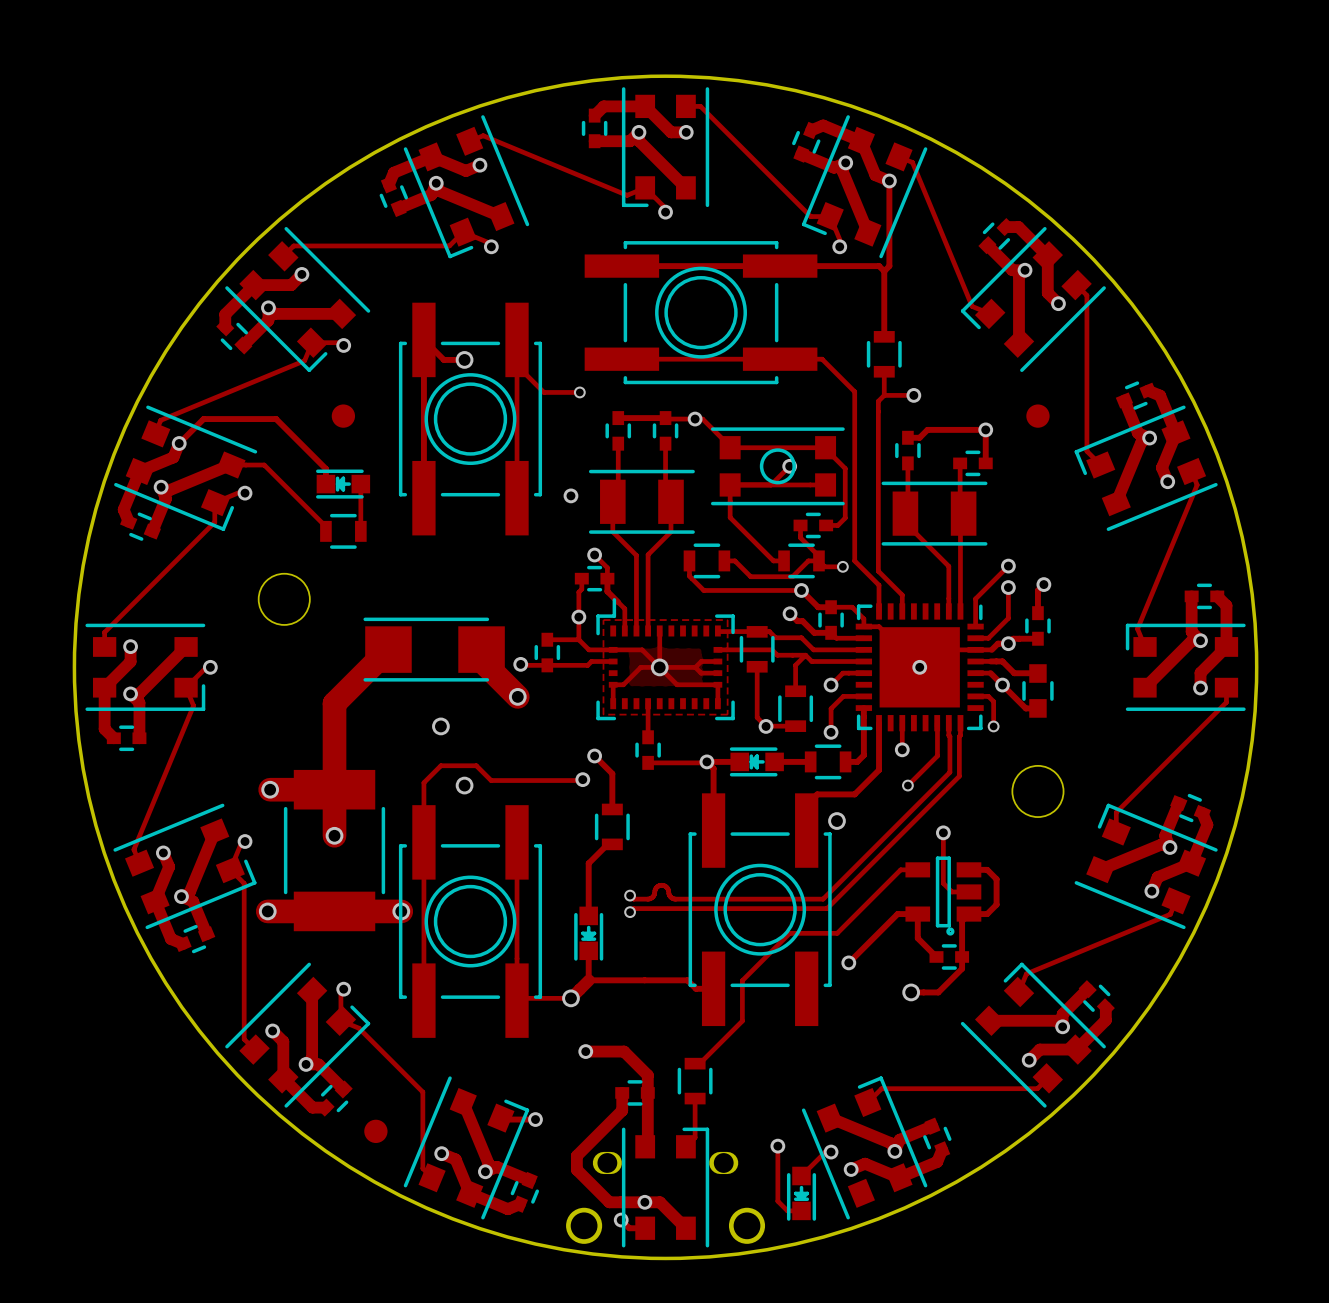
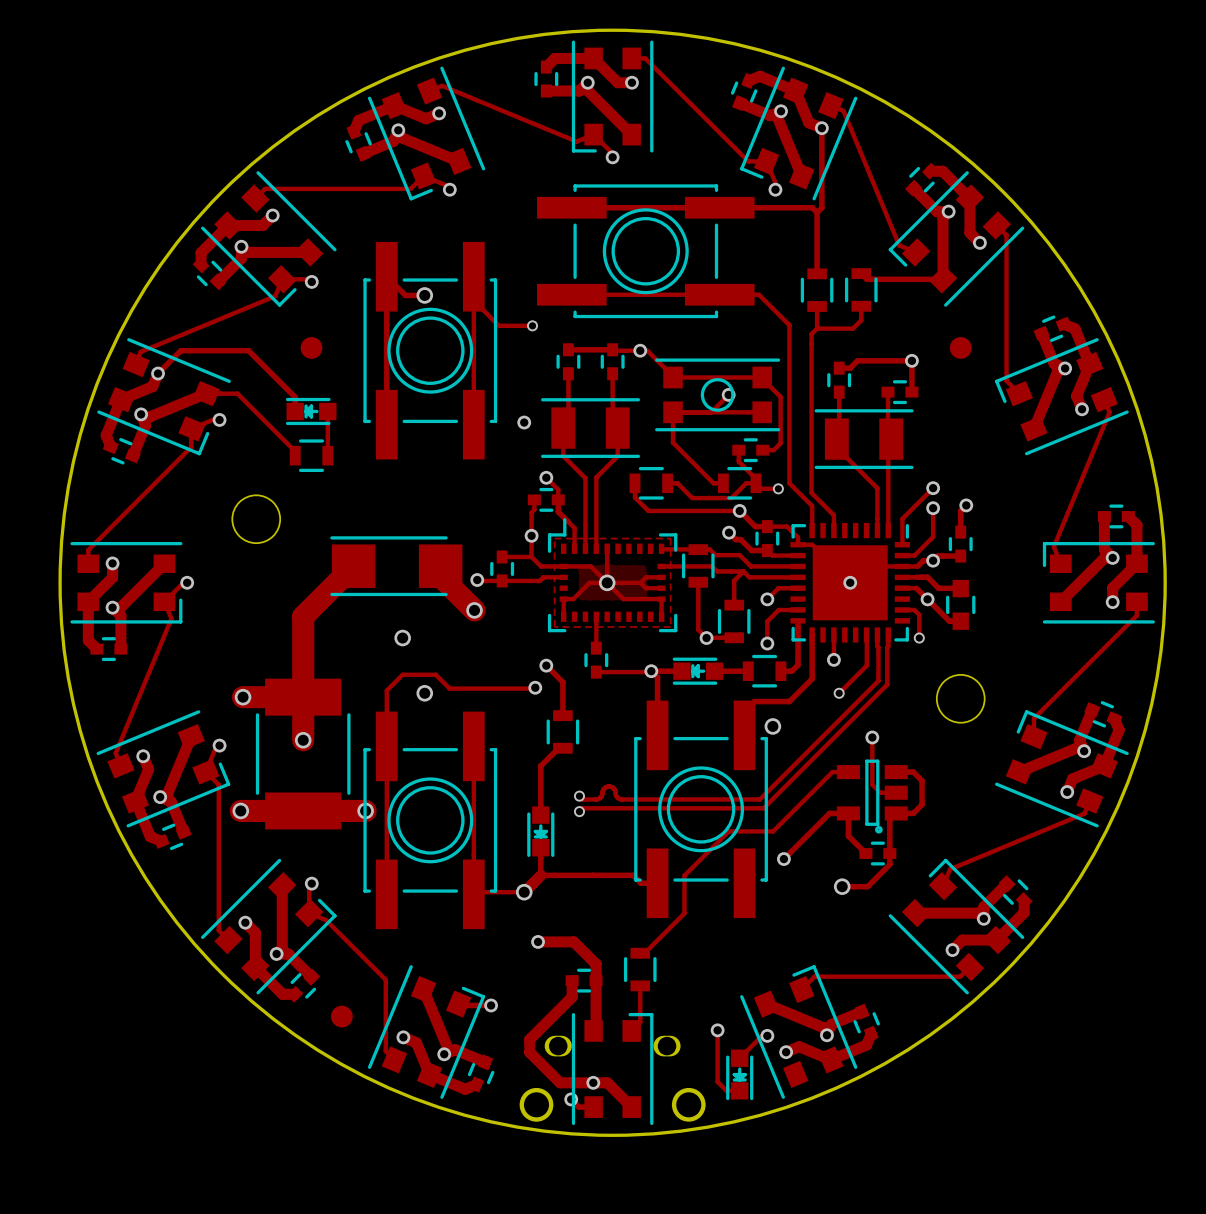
track: none -> (861, 273) (867, 279) (943, 279)
part: none -> (861, 289)
track: none -> (861, 306) (861, 320) (852, 328) (844, 328)
via: (913, 395) -> none

